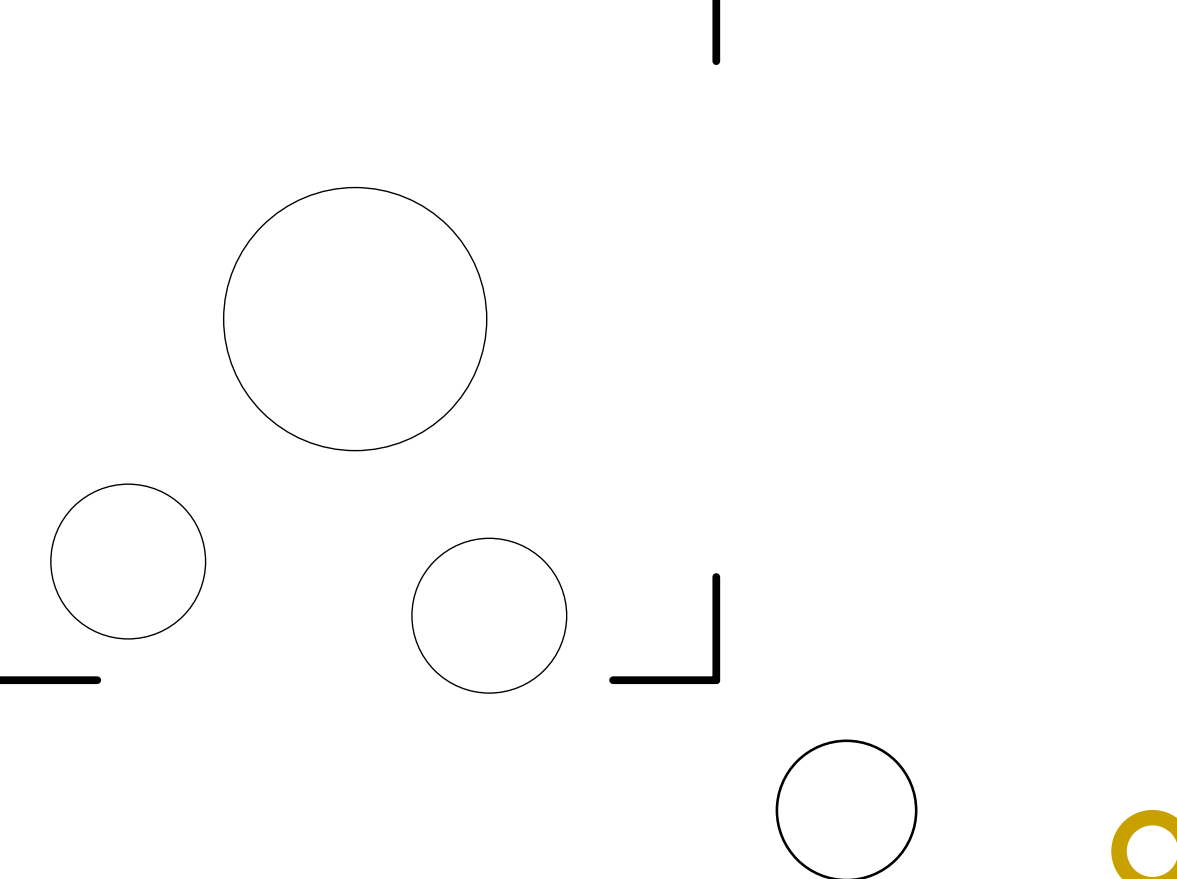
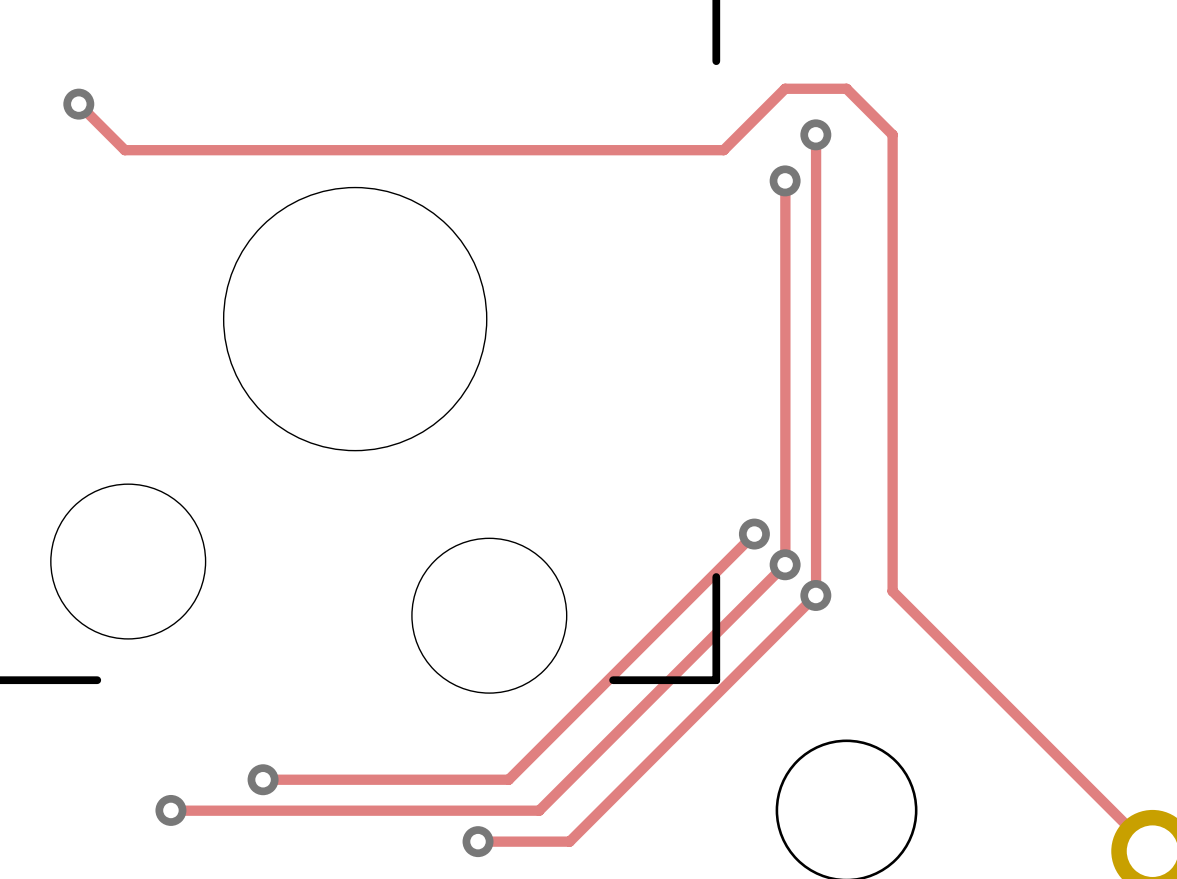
track: none -> (78, 104) (124, 150) (723, 150) (785, 88) (846, 88) (892, 134) (892, 591) (1152, 851)
via: none -> (78, 104)
via: none -> (815, 134)
track: none -> (816, 135) (816, 595) (569, 841) (478, 841)
via: none -> (785, 180)
track: none -> (785, 181) (785, 564) (539, 810) (171, 810)
track: none -> (754, 534) (508, 779) (263, 779)
via: none -> (754, 534)
via: none -> (785, 564)
via: none -> (815, 595)
via: none -> (263, 779)
via: none -> (170, 810)
via: none -> (478, 841)

